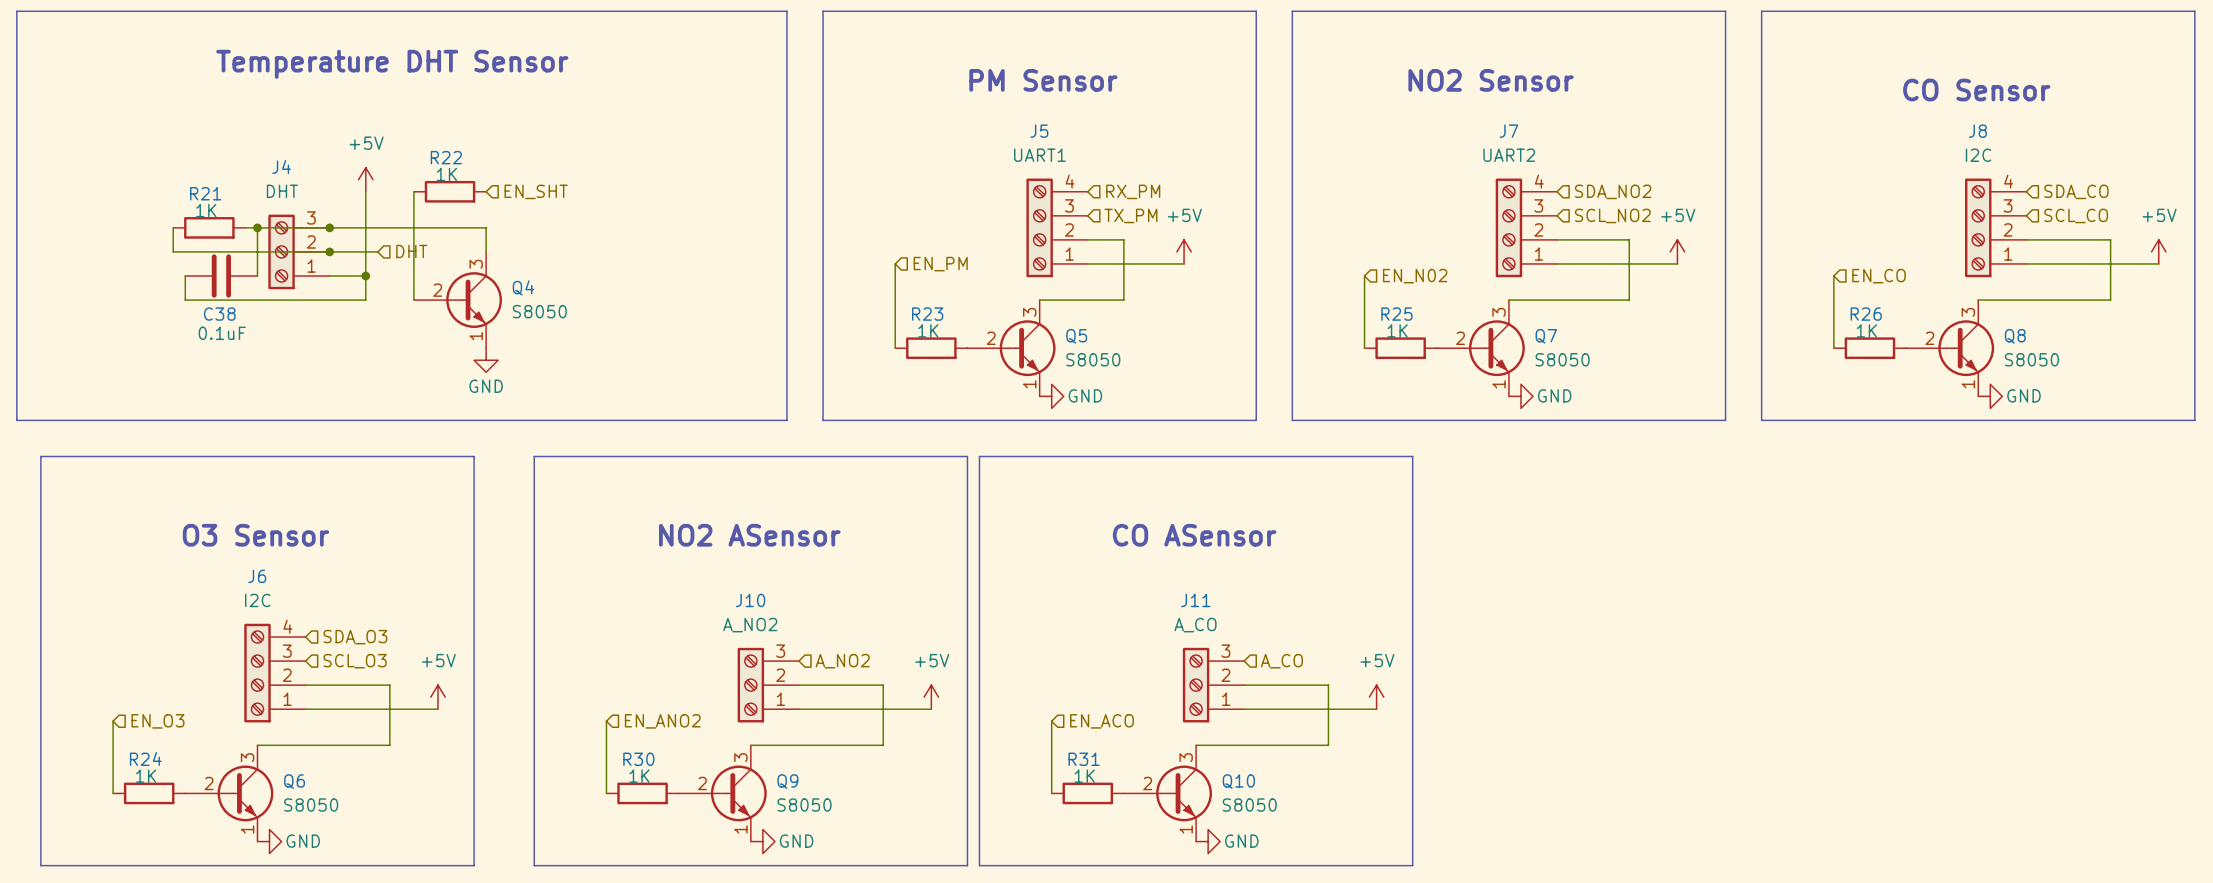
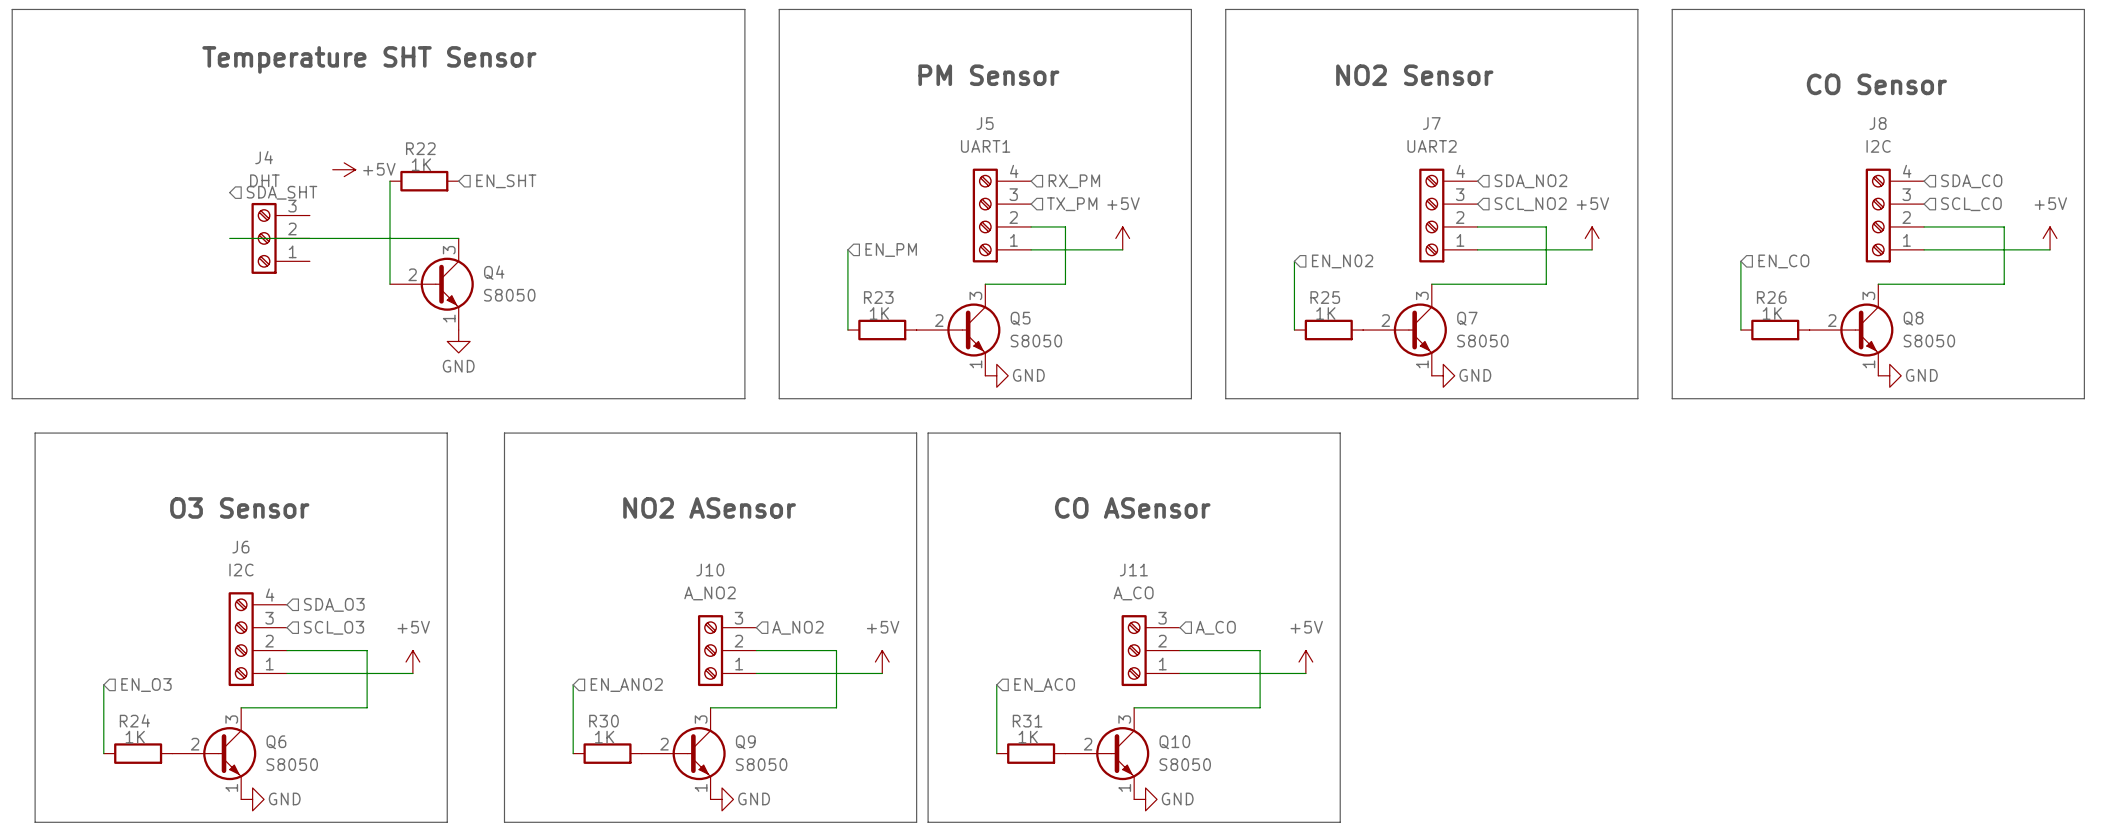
text: Temperature DHT Sensor (392, 64) -> Temperature SHT Sensor (369, 59)
power symbol rotation: 0° (365, 179) -> 90° clockwise (344, 169)
wire: (365, 191) (365, 300) (185, 300) (185, 276) -> none
hierarchical label: none -> SDA_SHT (281, 192)
wire: (173, 227) (173, 251) (245, 251) -> none
R21: 1K (209, 227) -> none
wire: (245, 227) (486, 227) (486, 251) -> (355, 238) (458, 238)
wire: (257, 227) (257, 276) -> none
junction: (257, 227) -> none
junction: (329, 227) -> none
junction: (329, 251) -> none
hierarchical label: DHT (411, 251) -> none
C38: 0.1uF (221, 276) -> none
wire: (329, 276) (365, 276) -> none
junction: (365, 276) -> none

